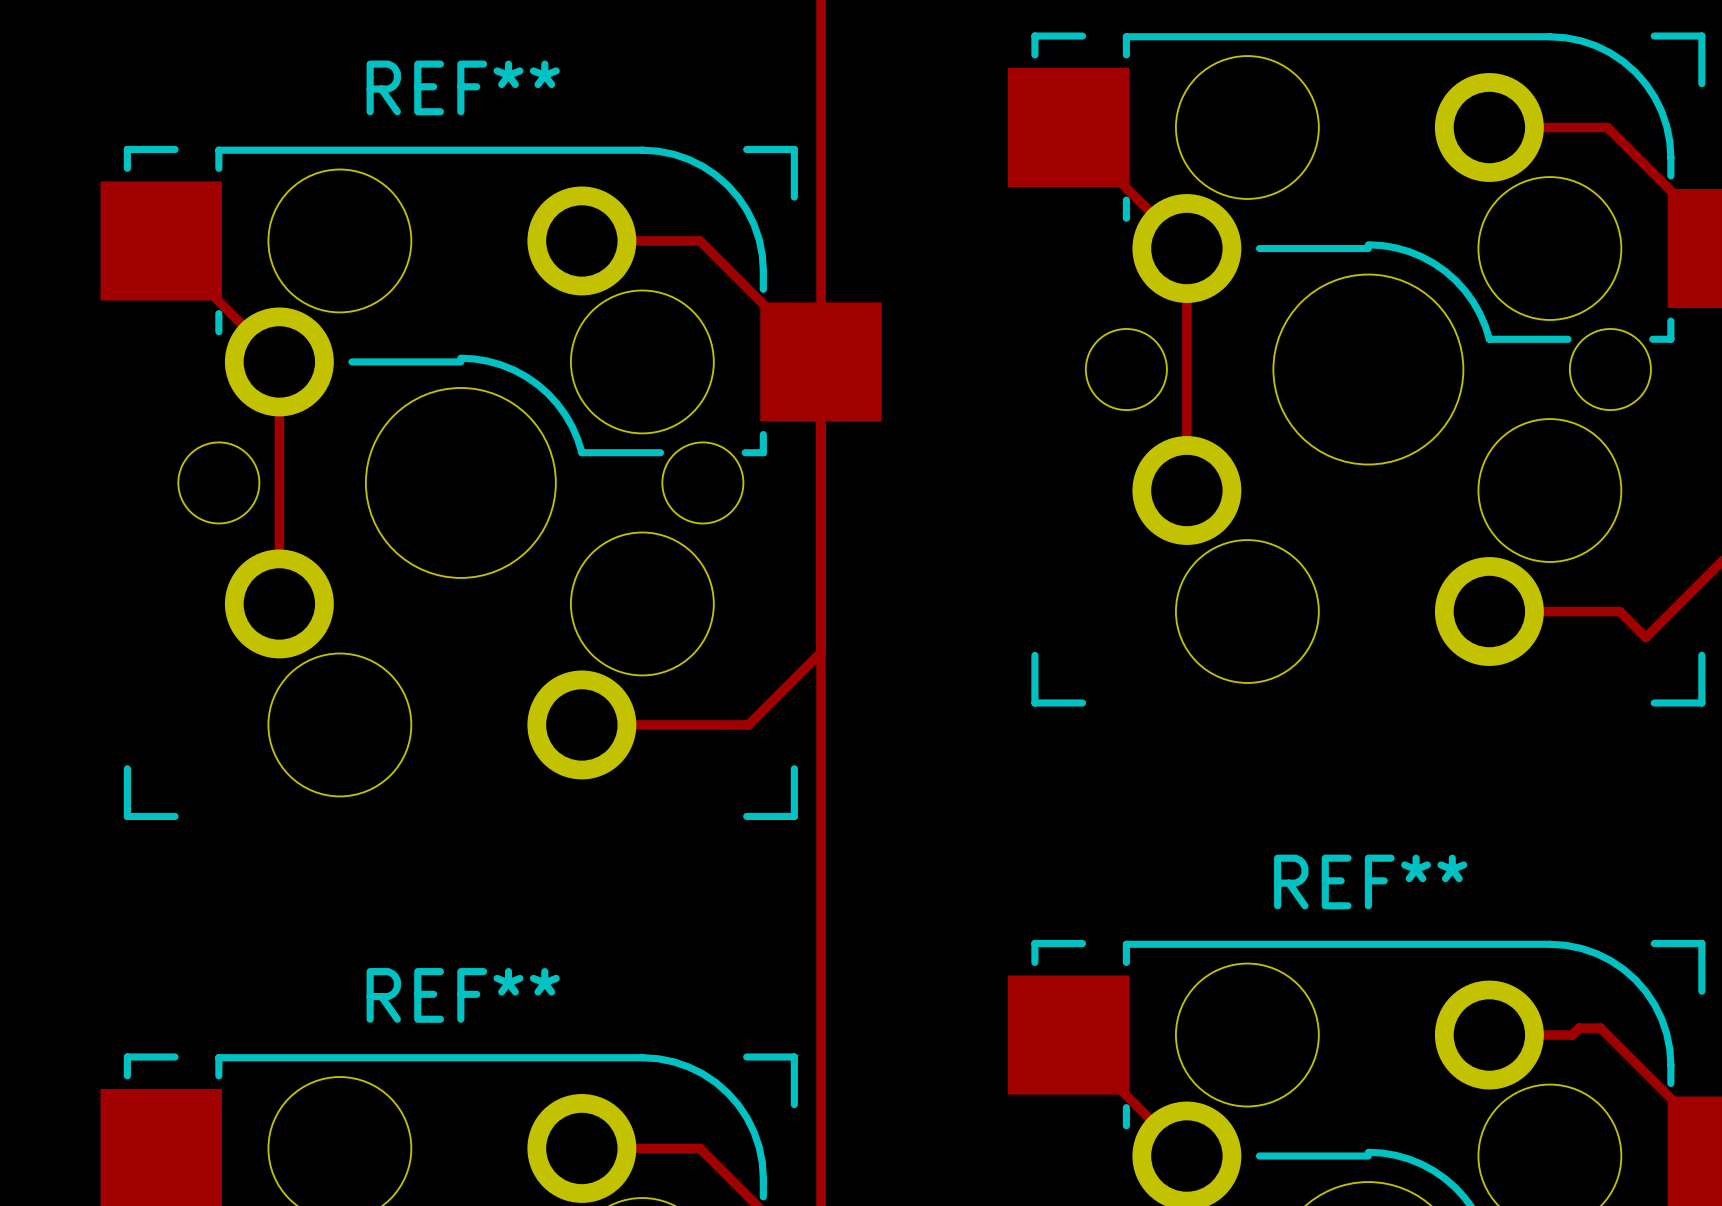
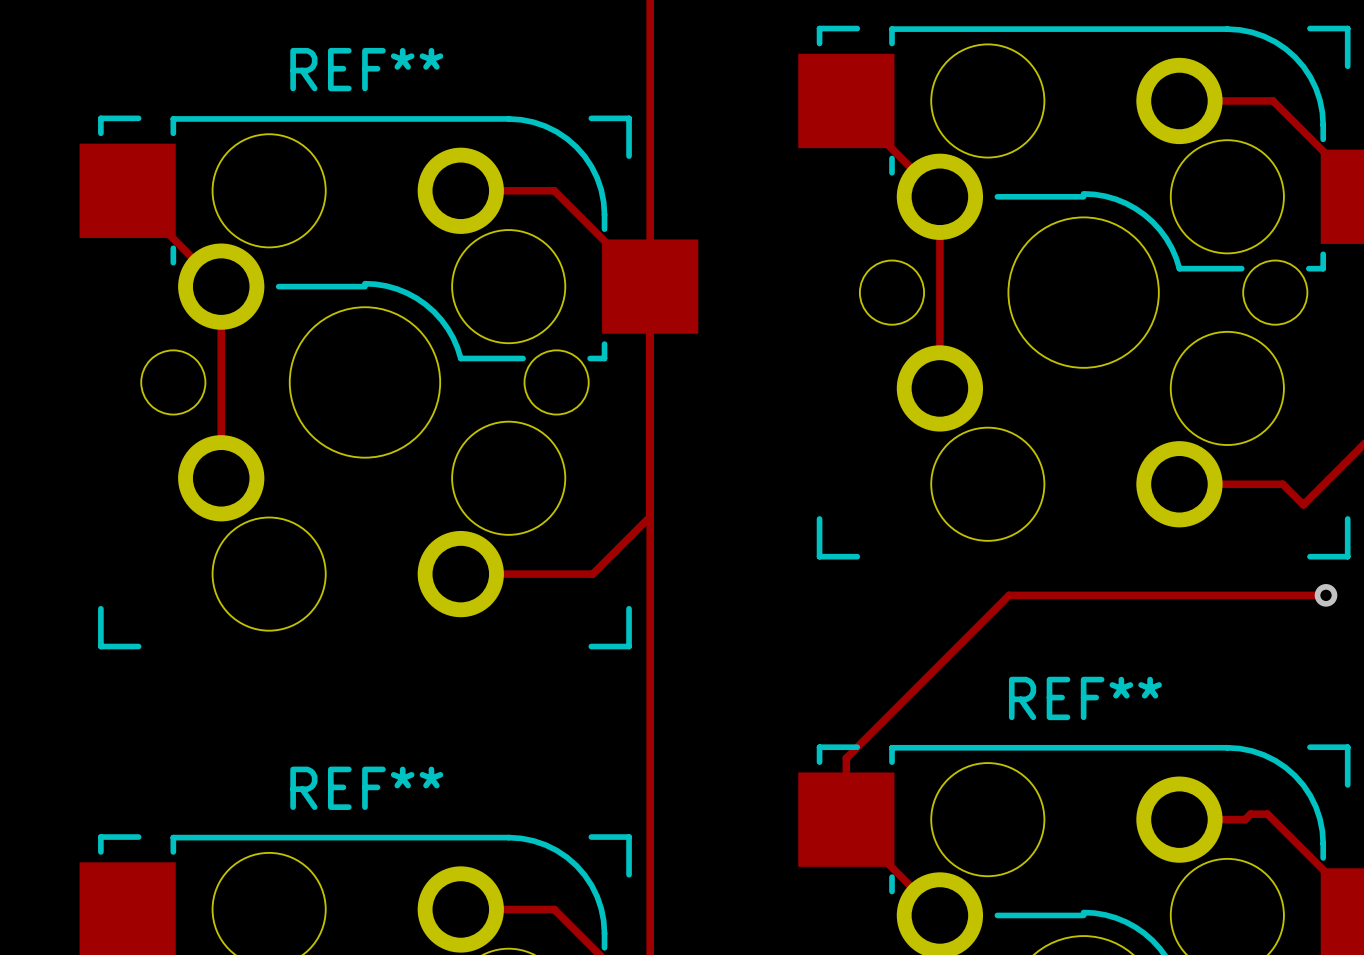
track: none -> (1326, 595) (1009, 595) (846, 758) (846, 819)
via: none -> (1326, 595)

